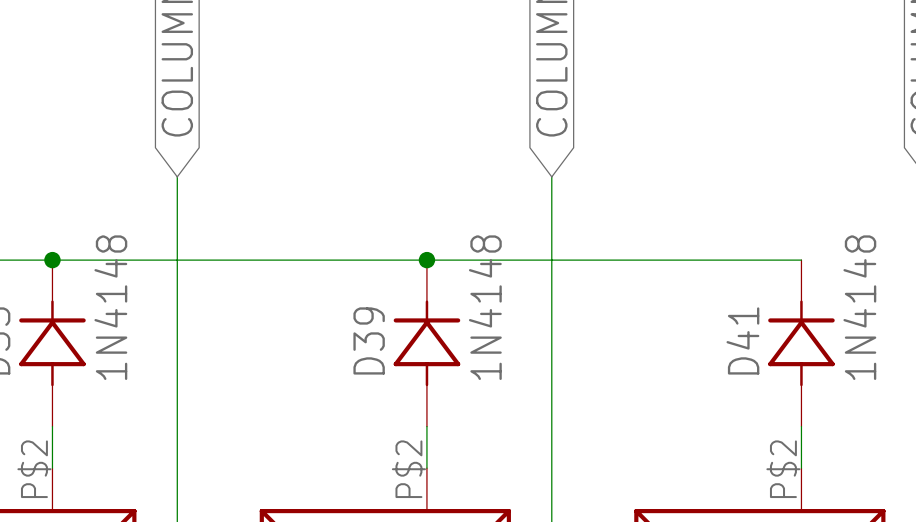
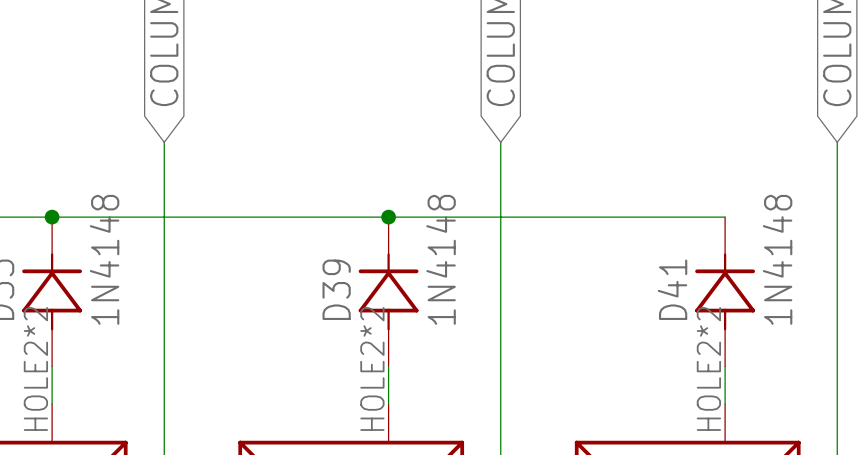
part pin number: P$2 (34, 469) -> HOLE2*2 (35, 368)
part pin number: P$2 (408, 469) -> HOLE2*2 (372, 368)
part pin number: P$2 (783, 469) -> HOLE2*2 (708, 368)

